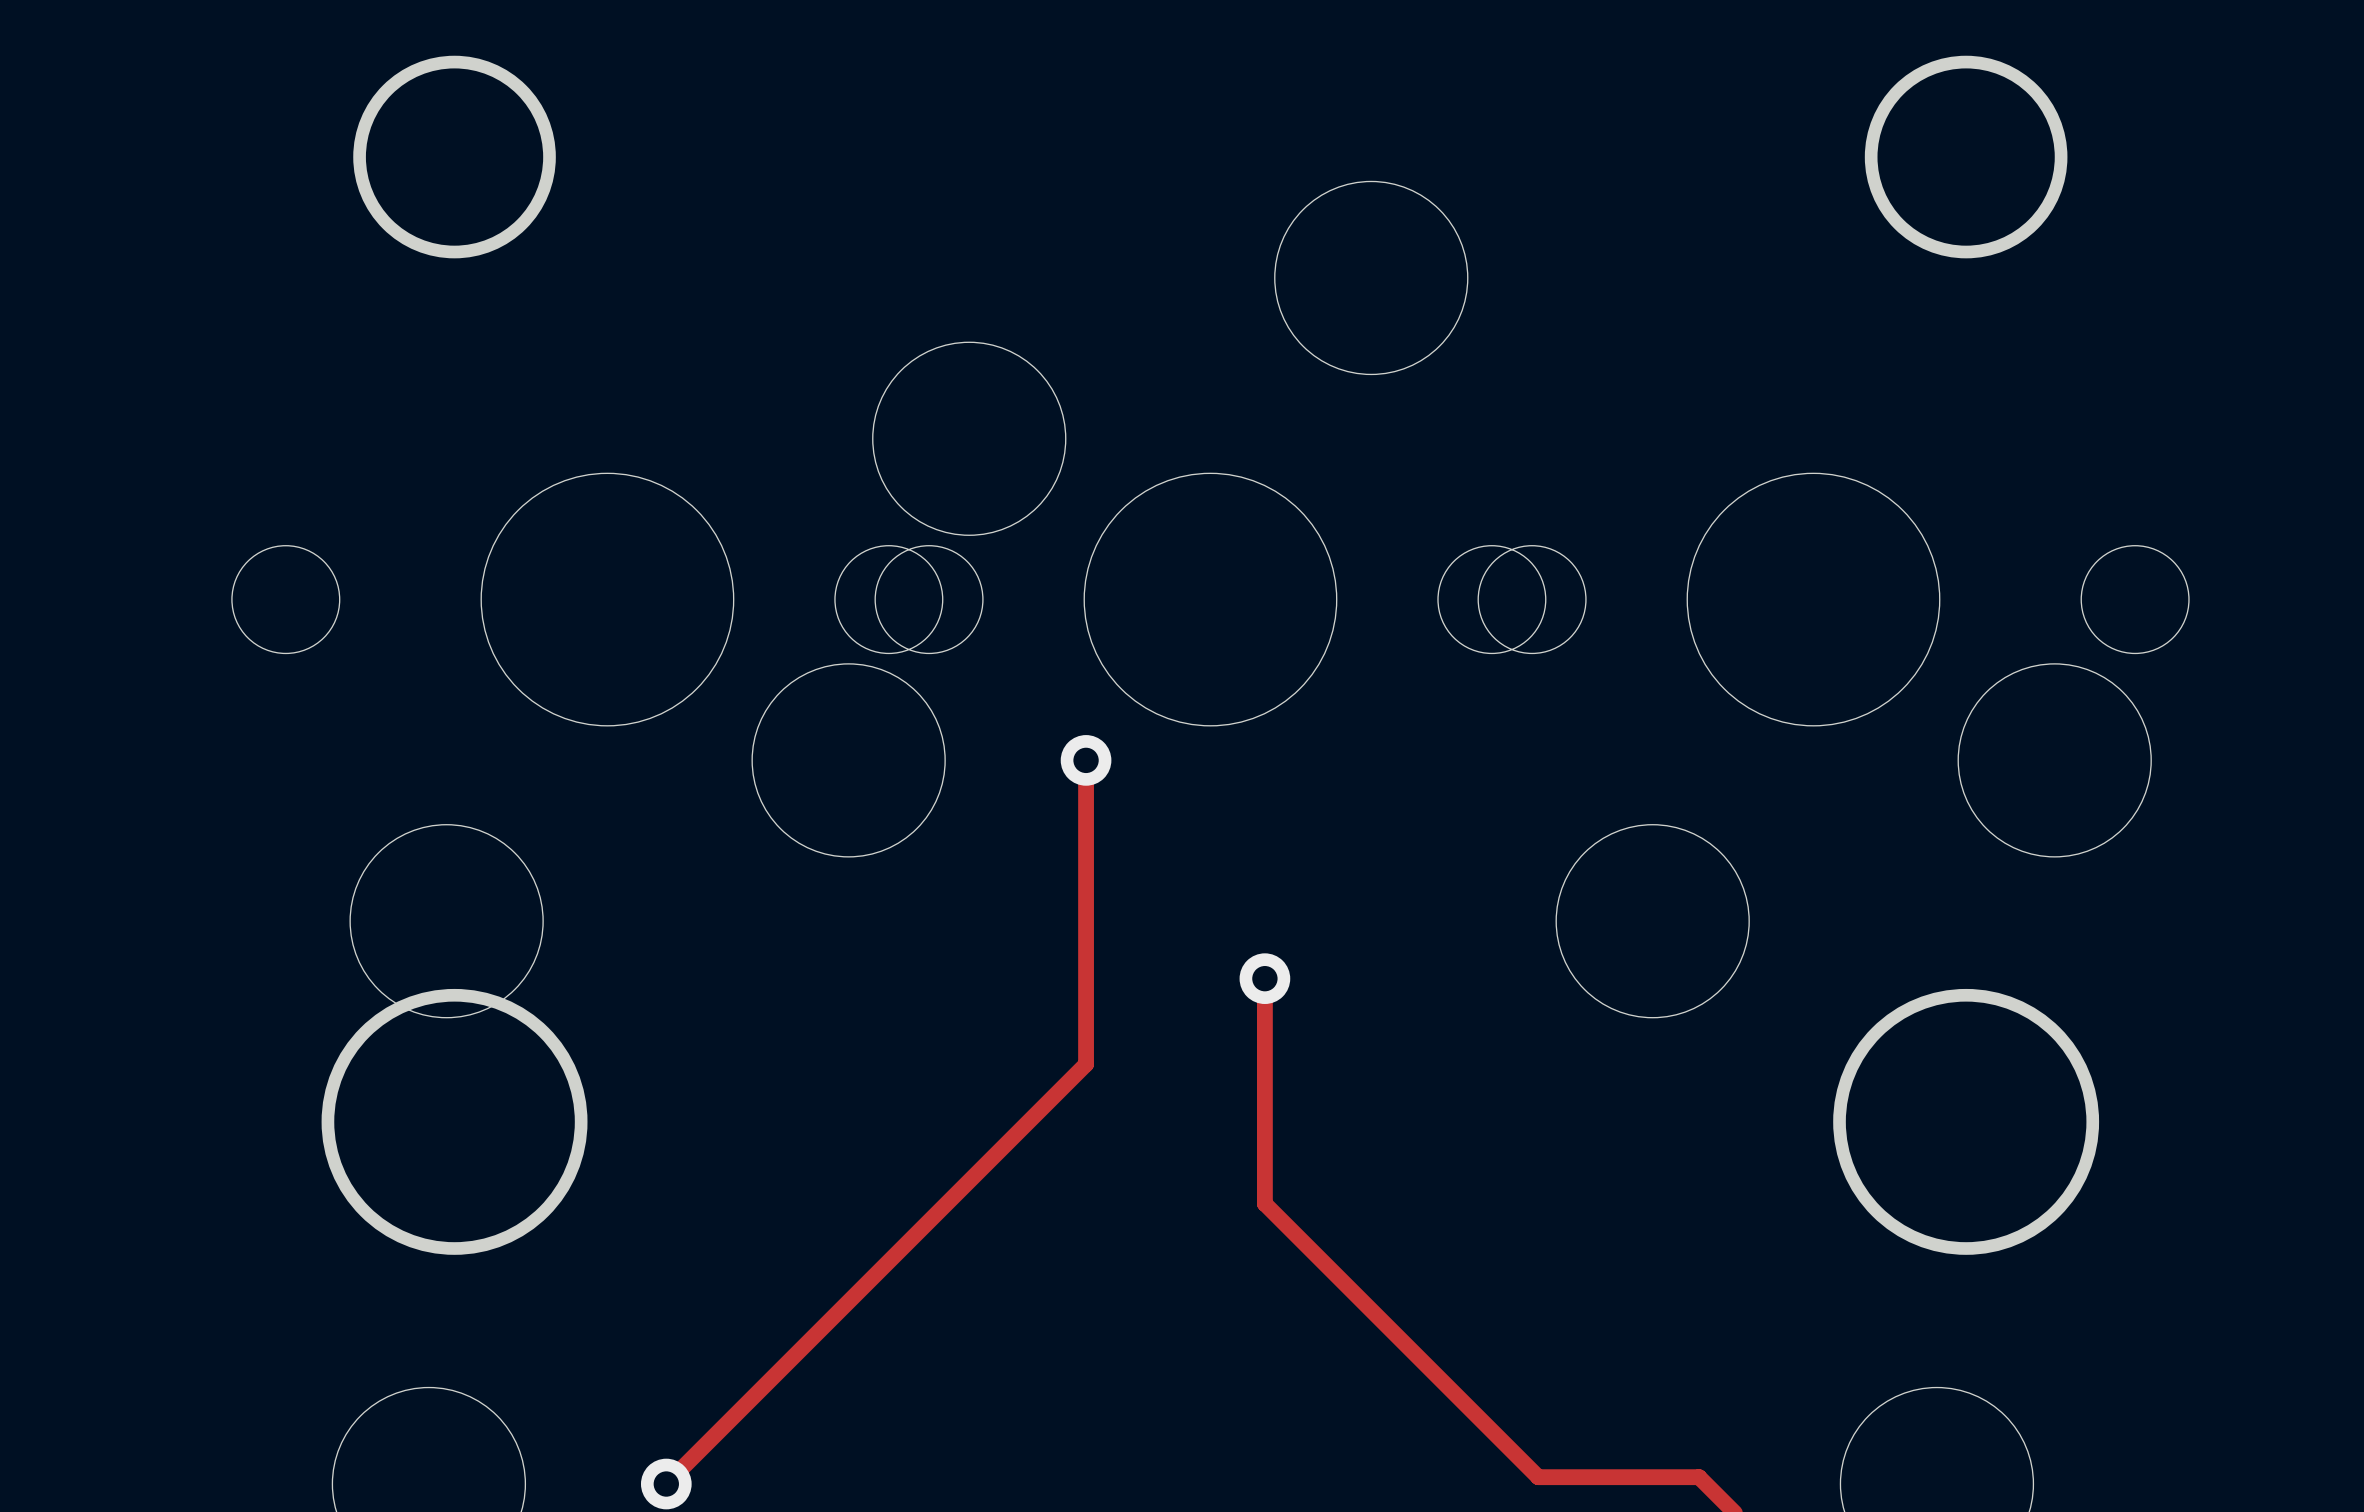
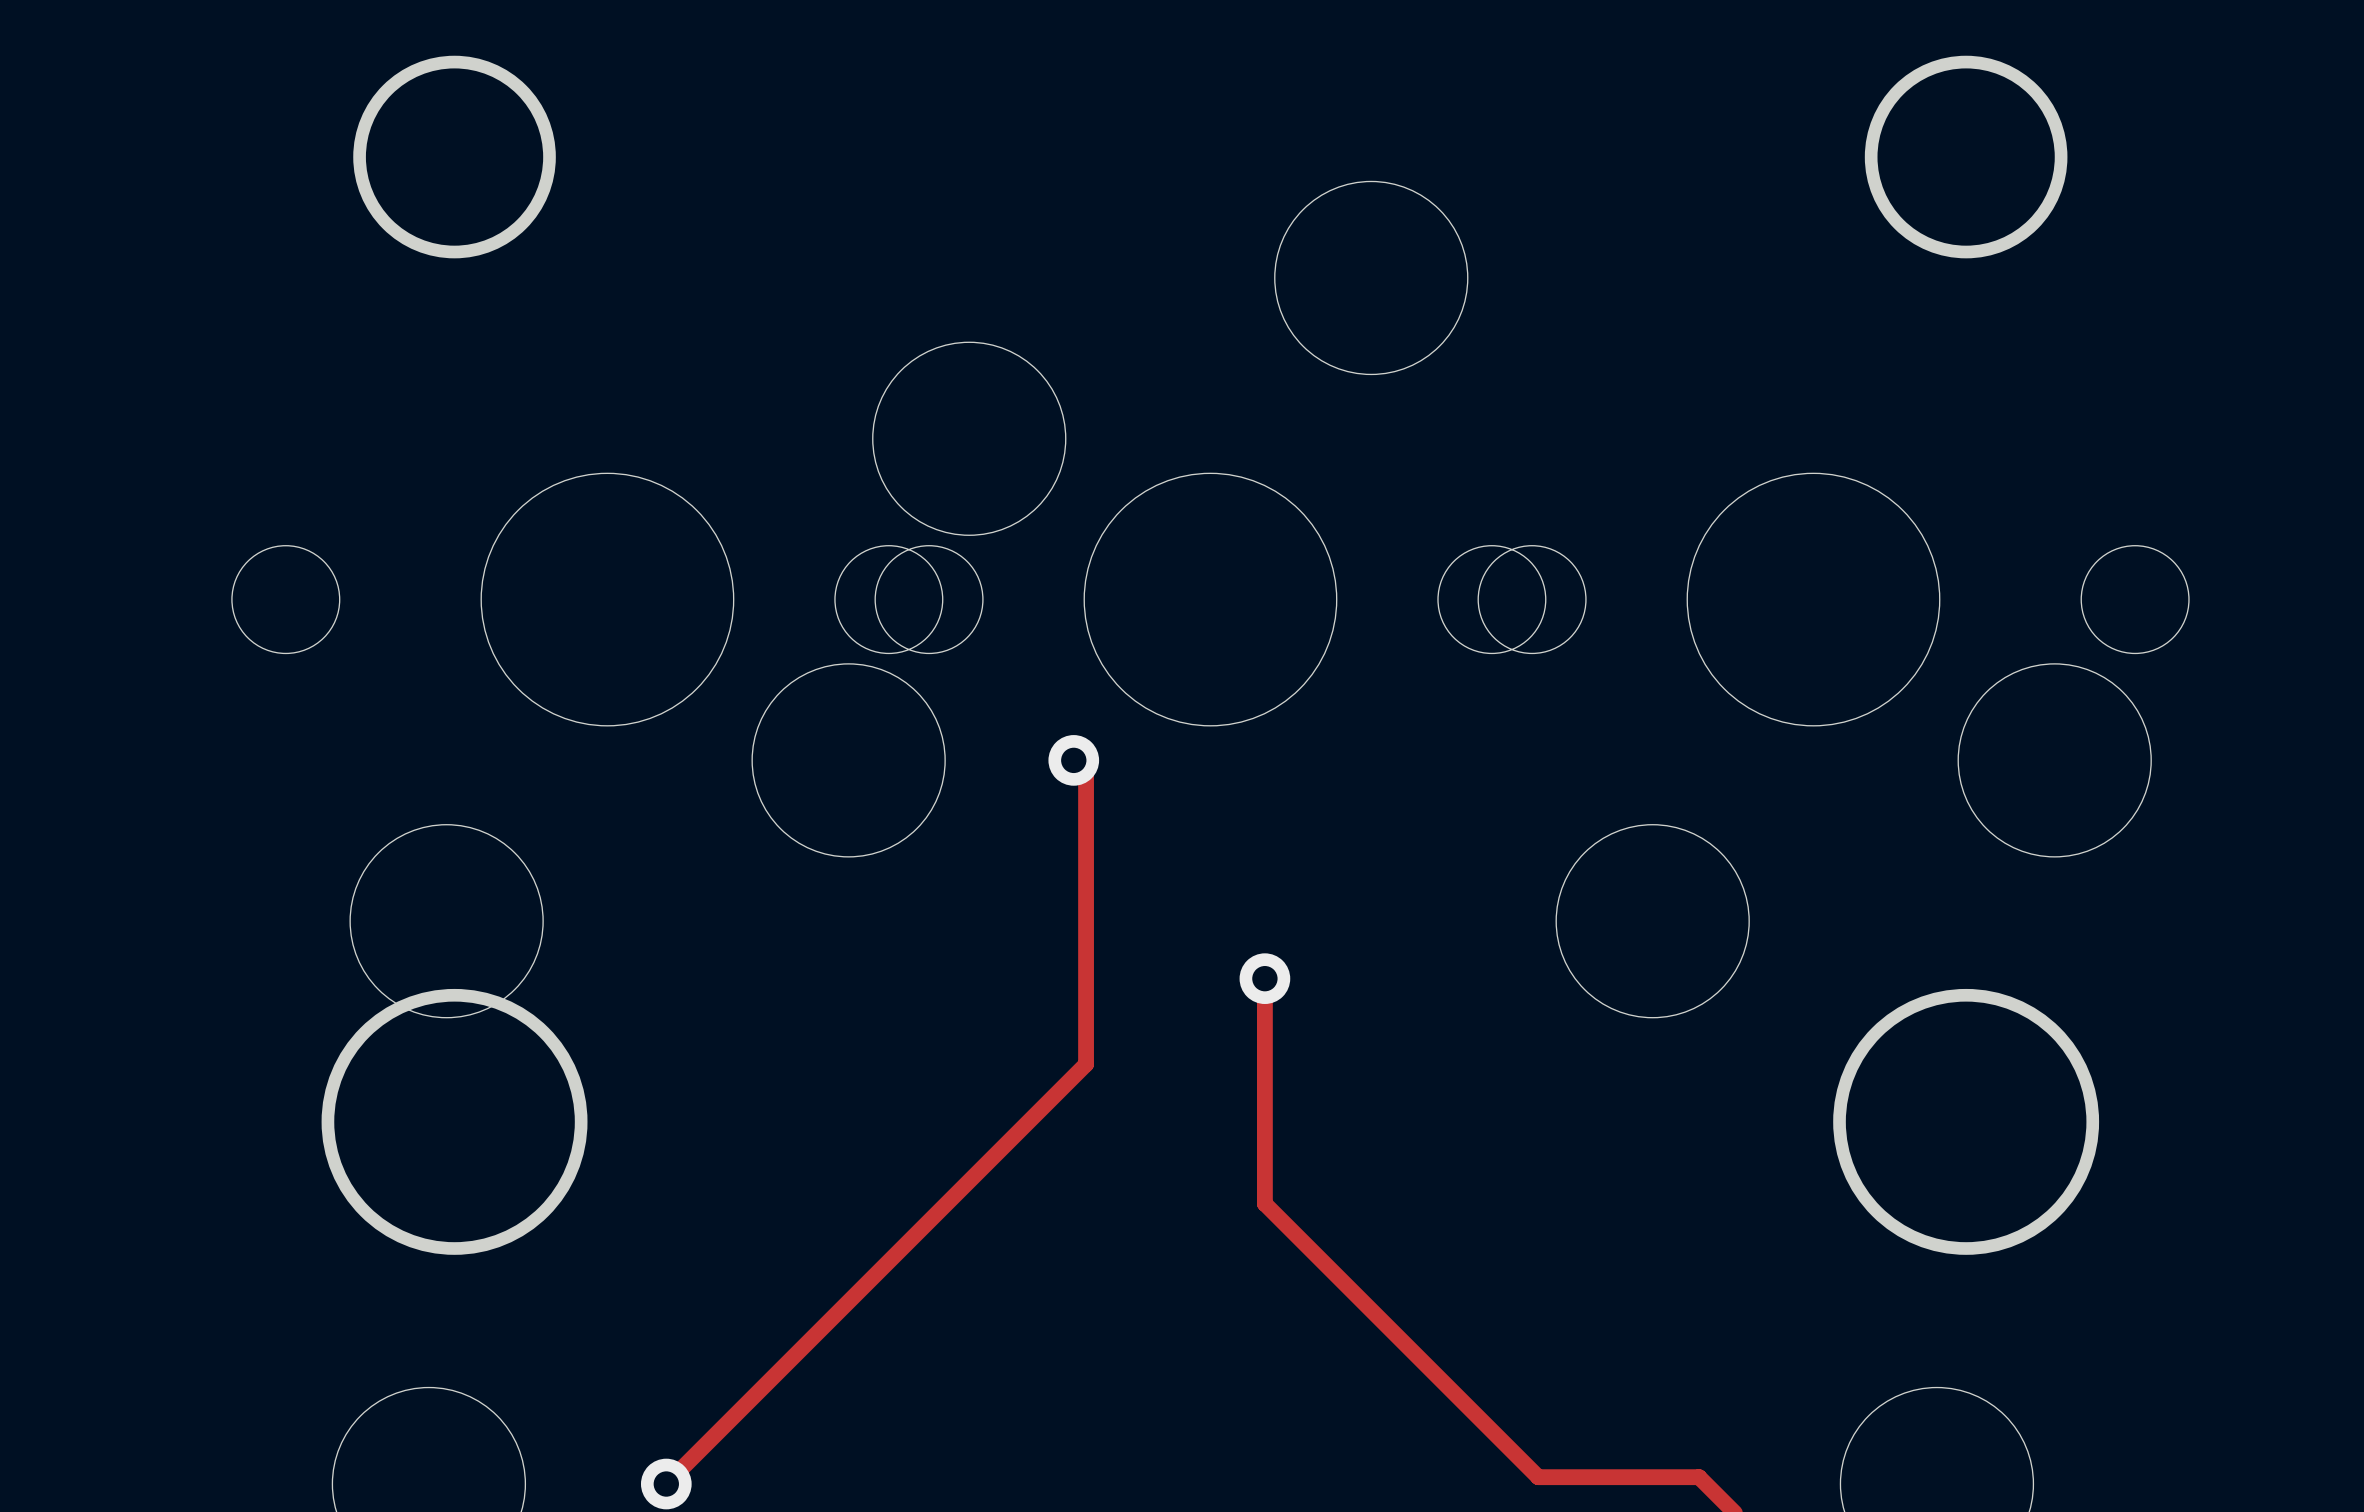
via position: (1086, 760) -> (1073, 760)

